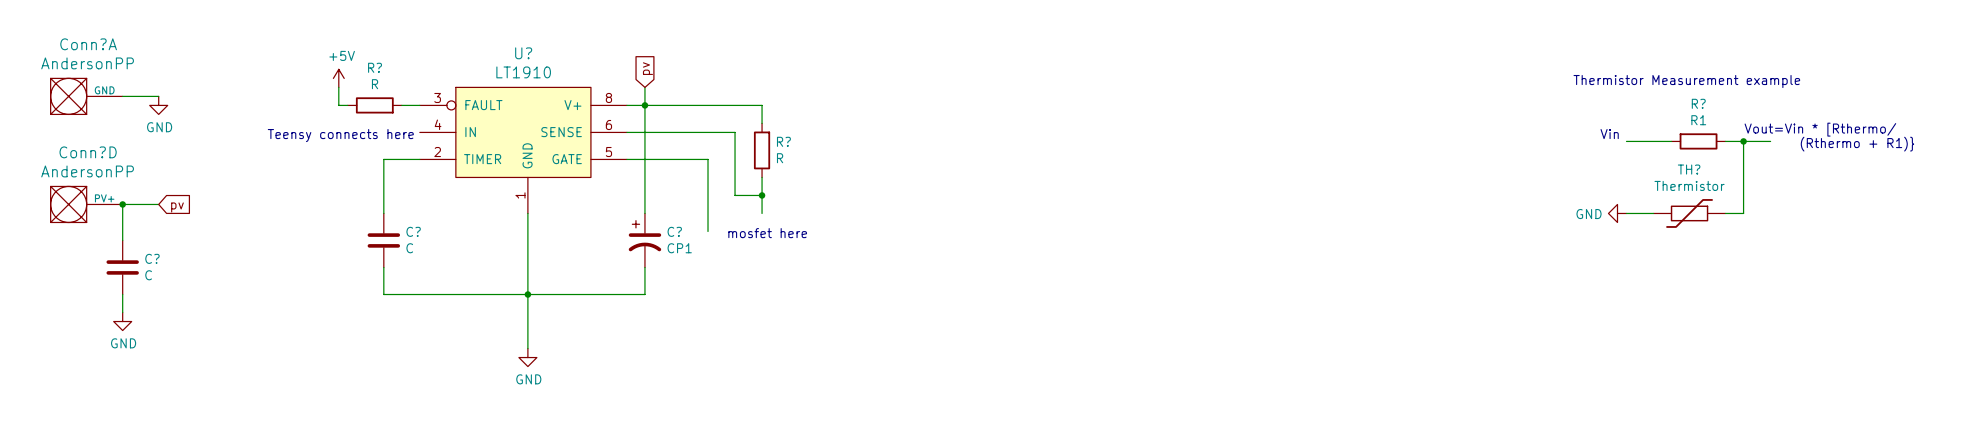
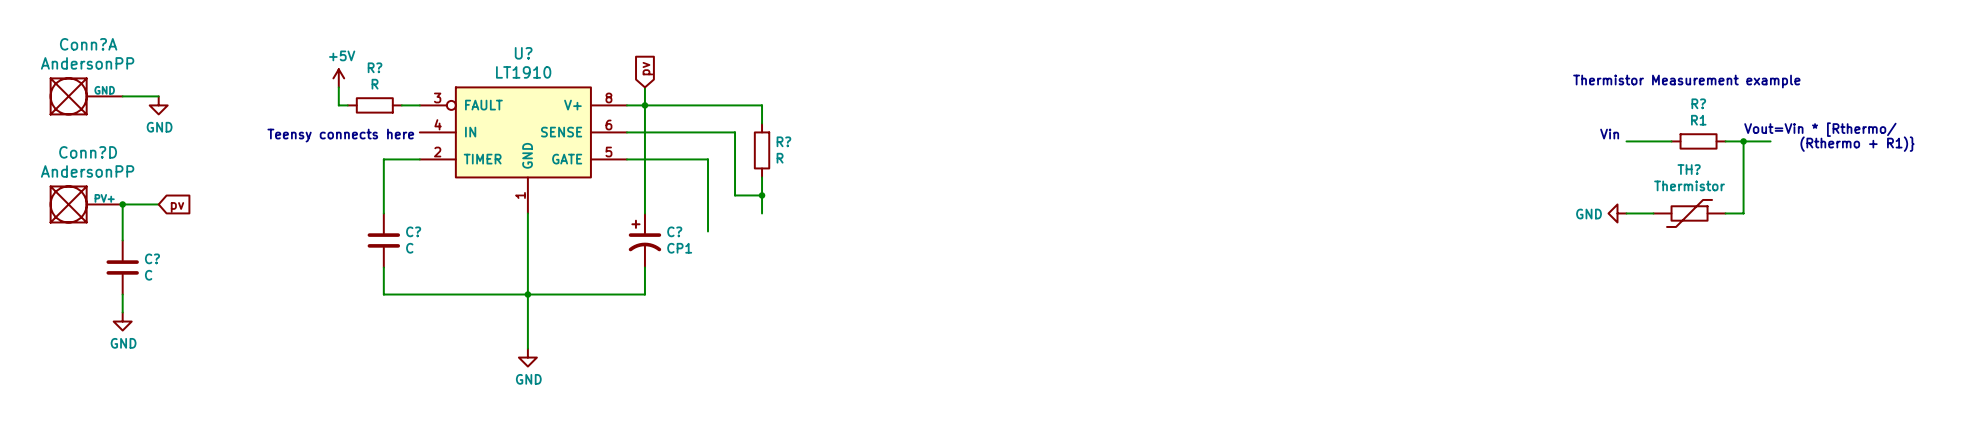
text: mosfet here (767, 233) -> none

